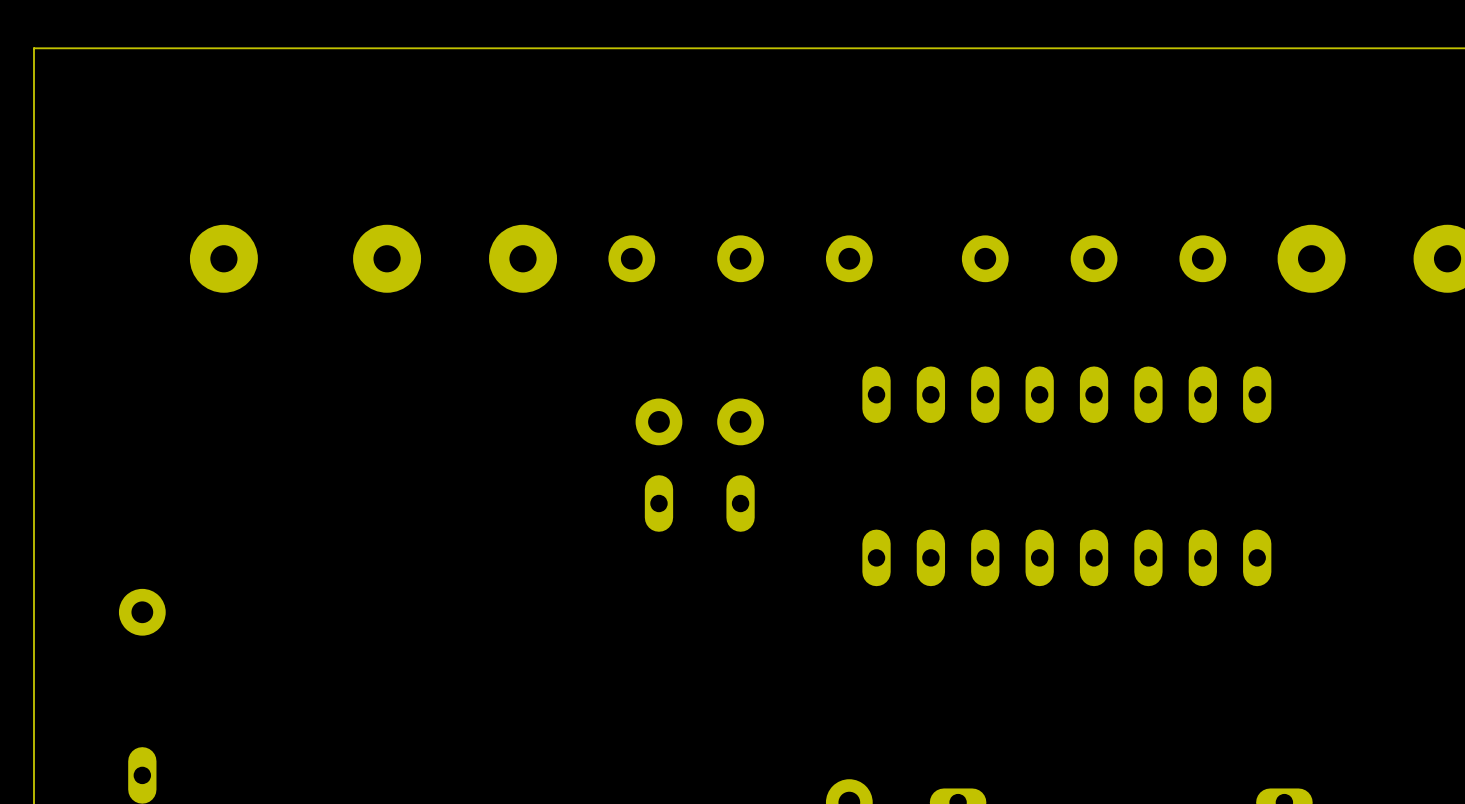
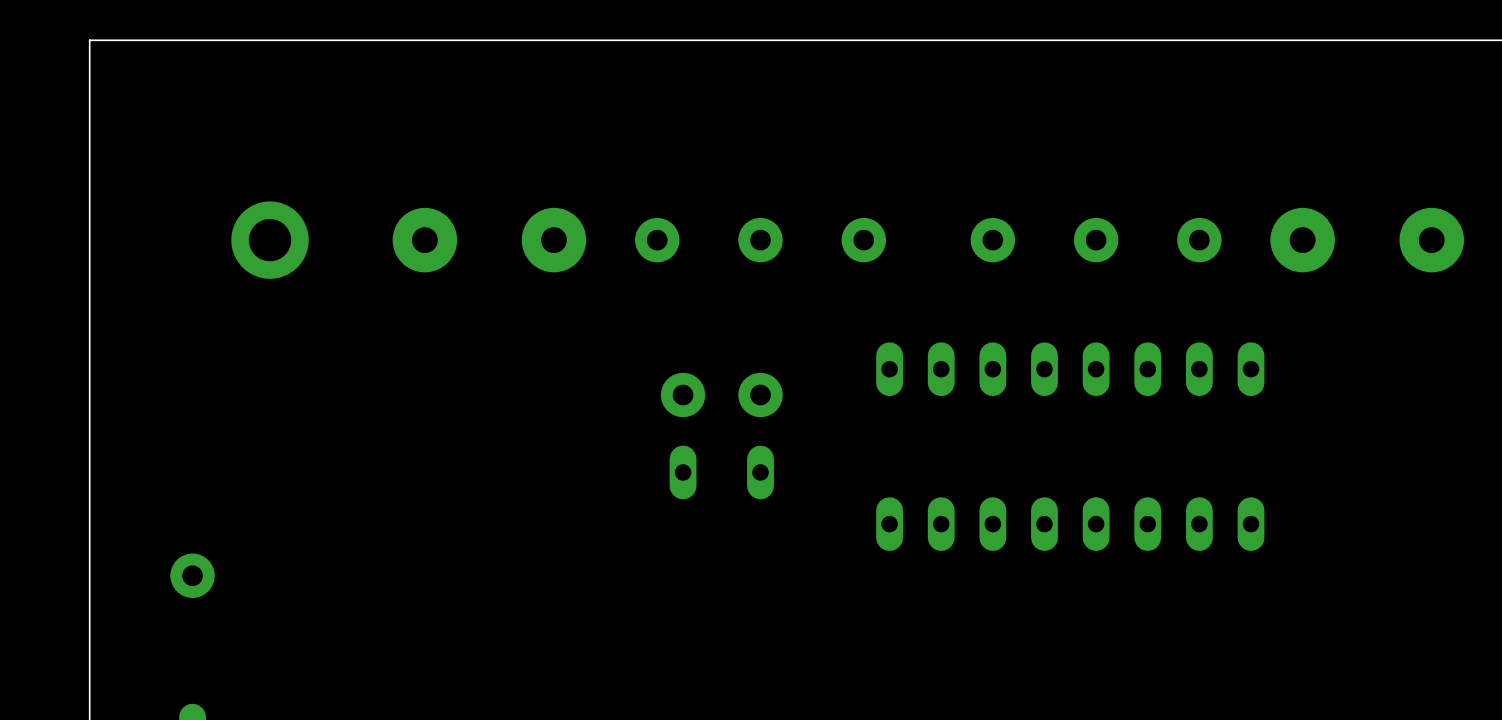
part footprint: [189, 224, 258, 293] -> [231, 201, 309, 279]

